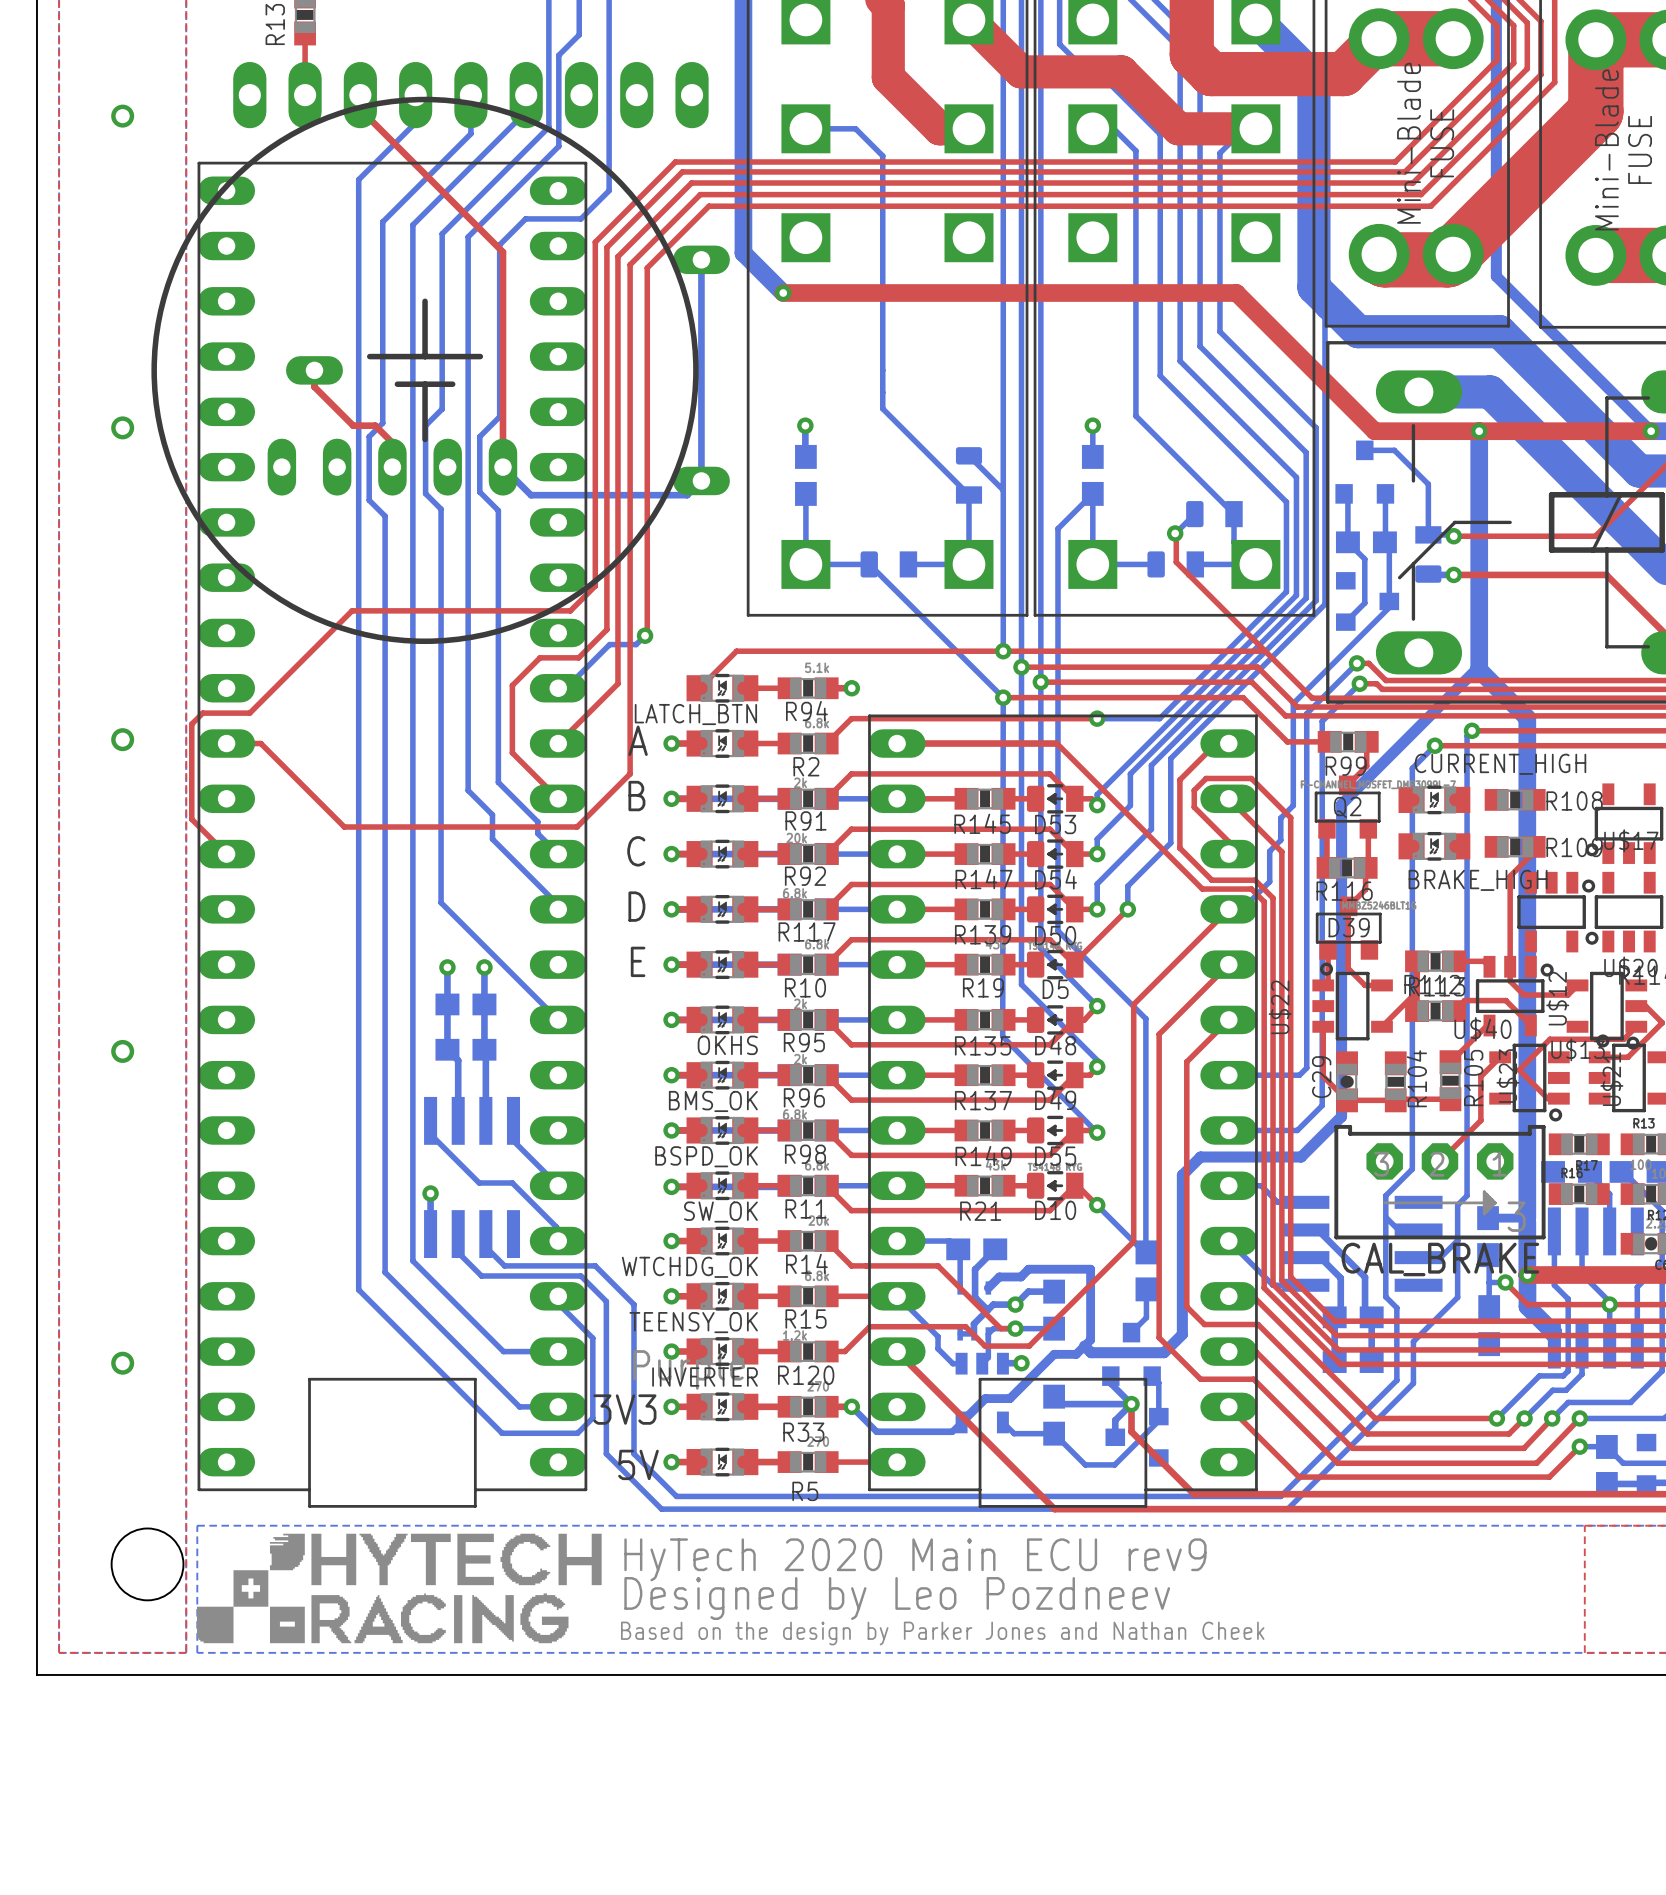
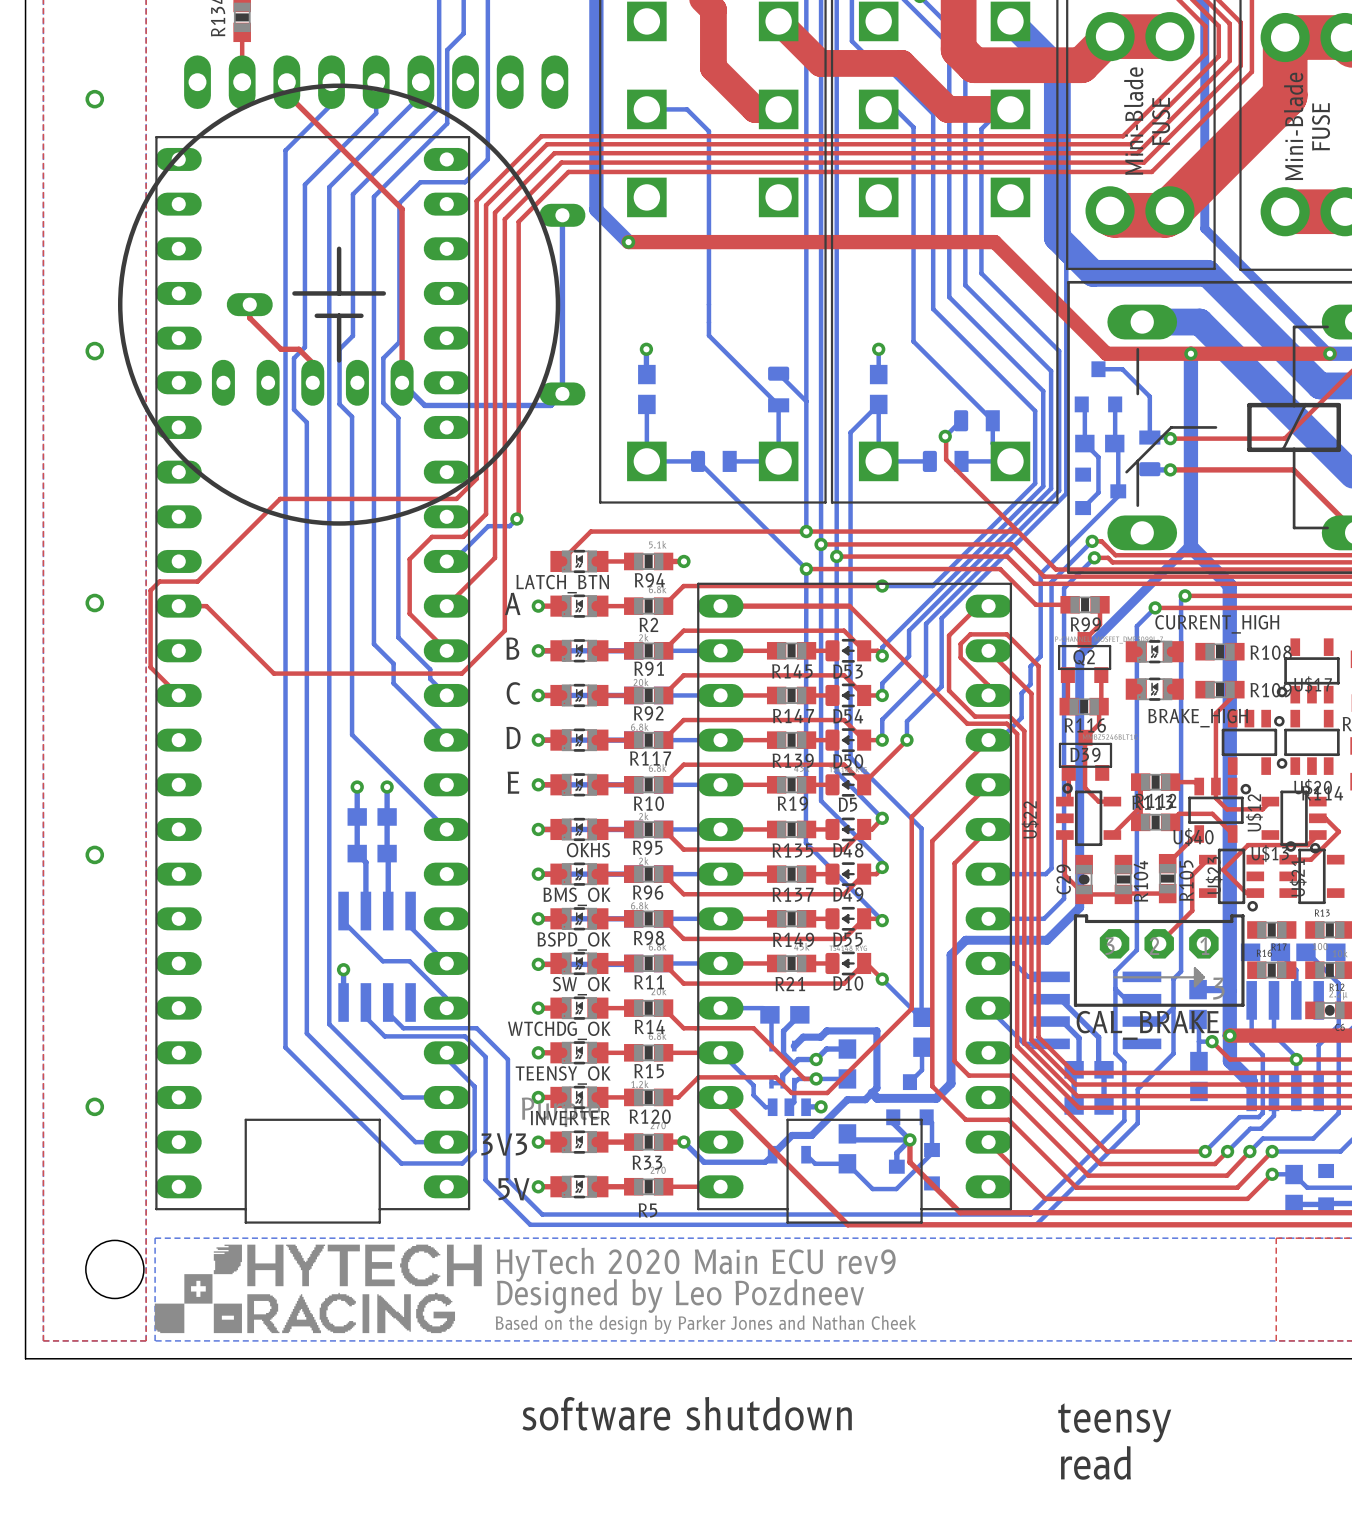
text: none -> software shutdown (687, 1413)
text: none -> teensy (1114, 1422)
text: none -> read (1095, 1462)

